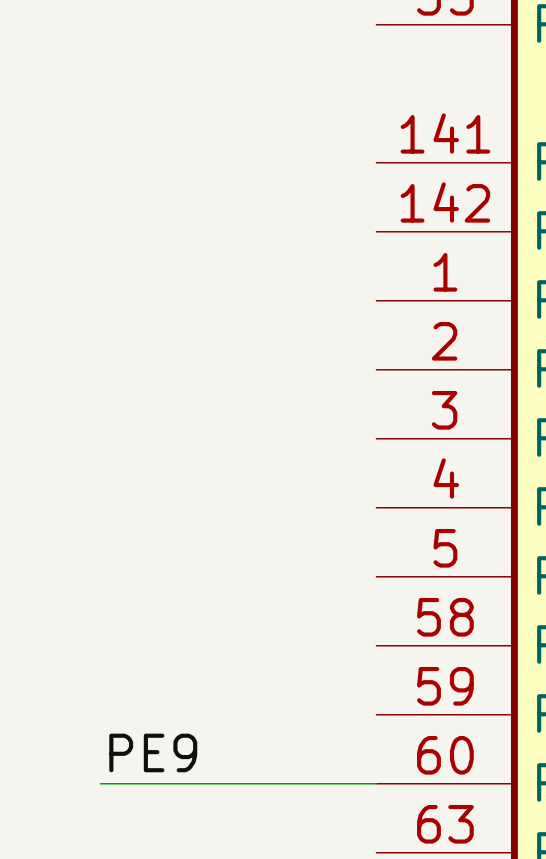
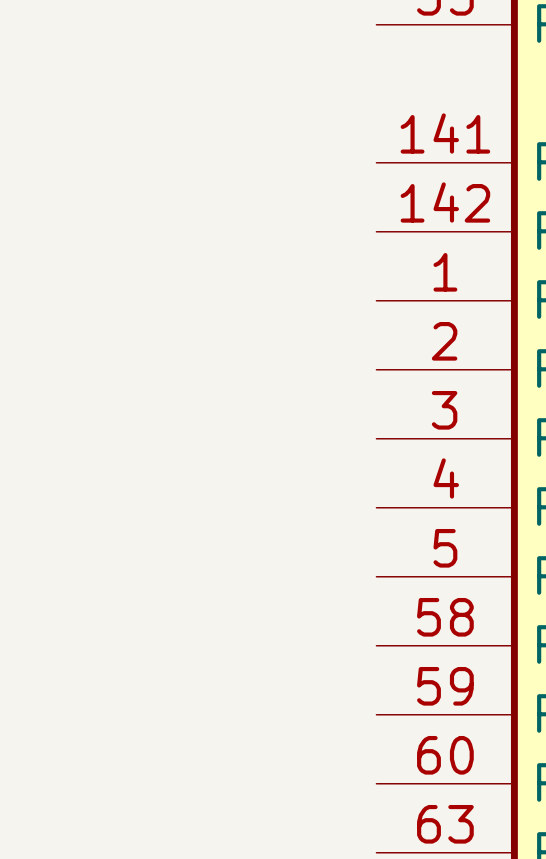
label: PE9 (153, 752) -> none
wire: (100, 783) (376, 783) -> none

